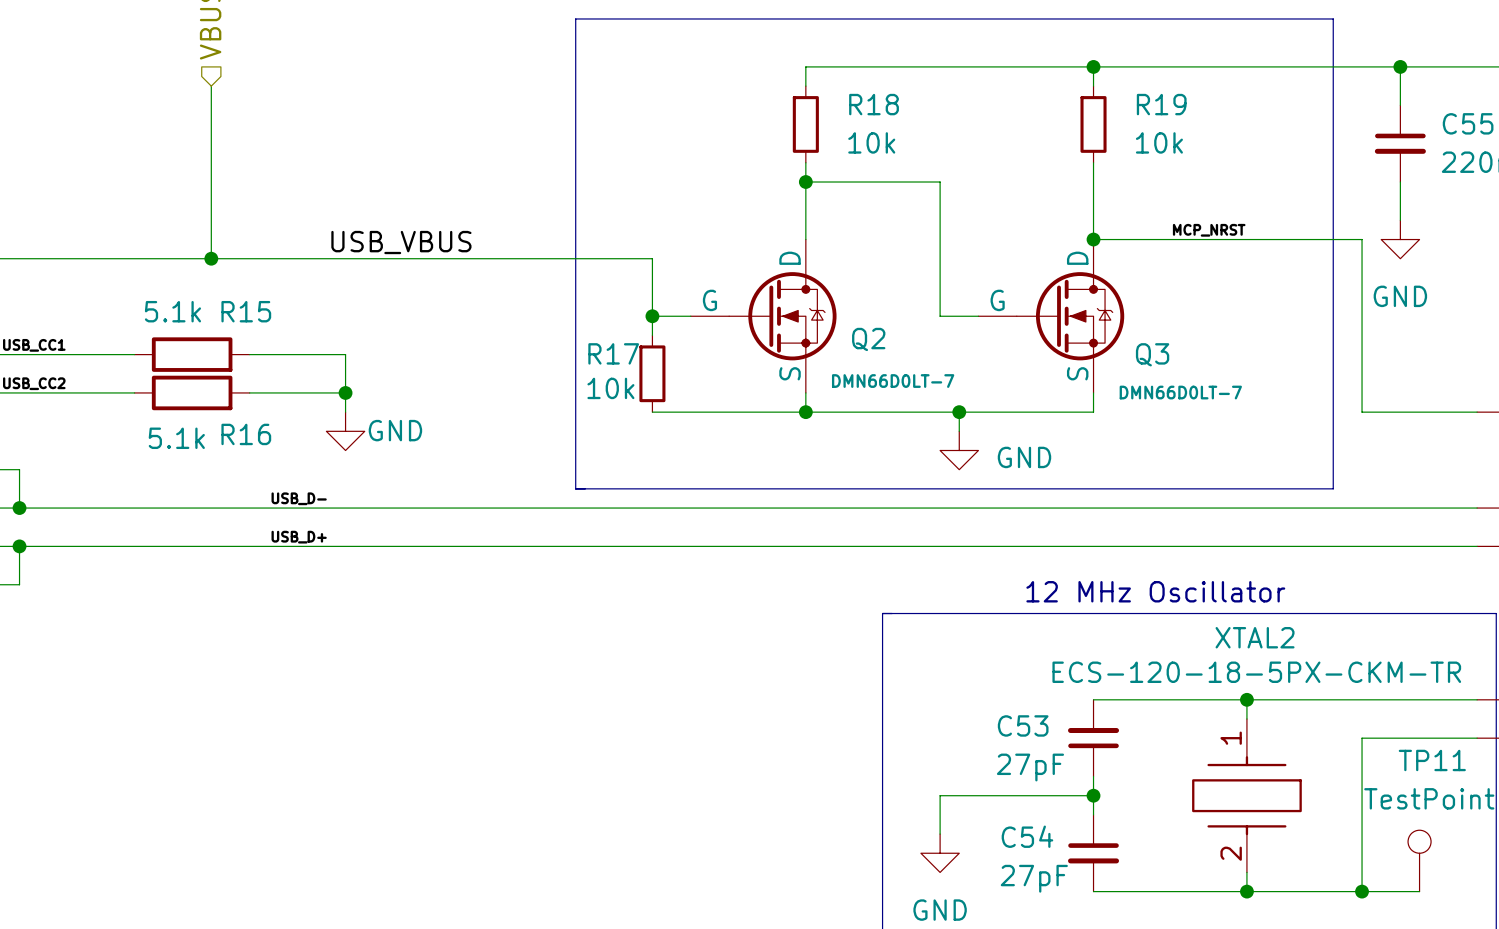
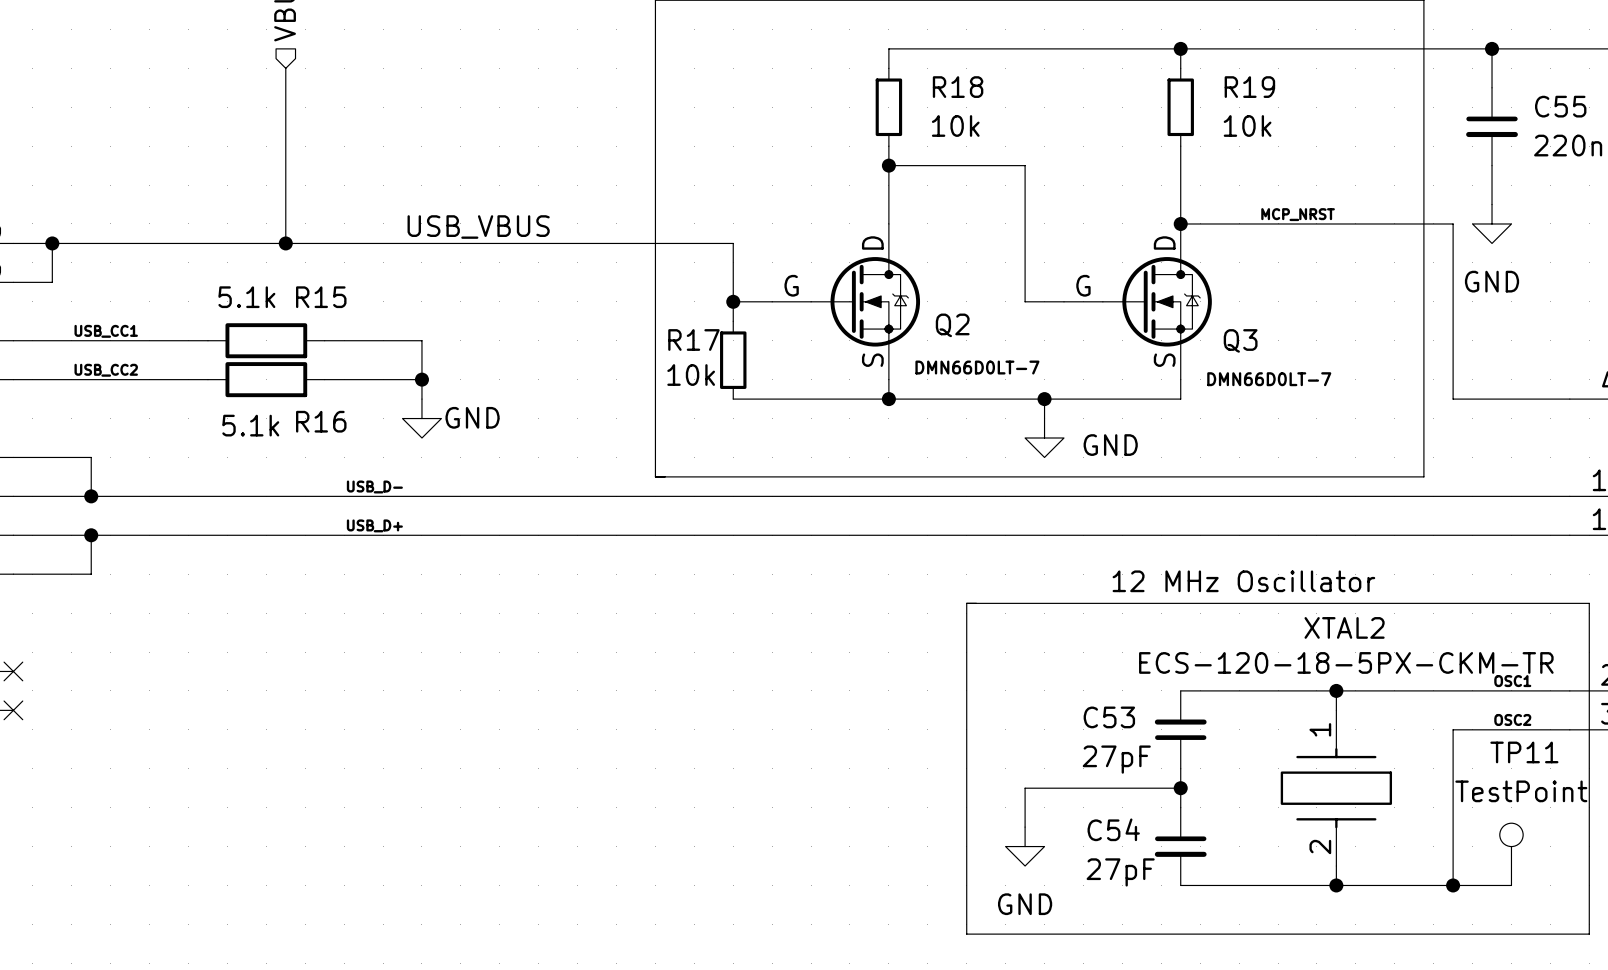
label: none -> OSC1 (1512, 681)
label: none -> OSC2 (1512, 719)

